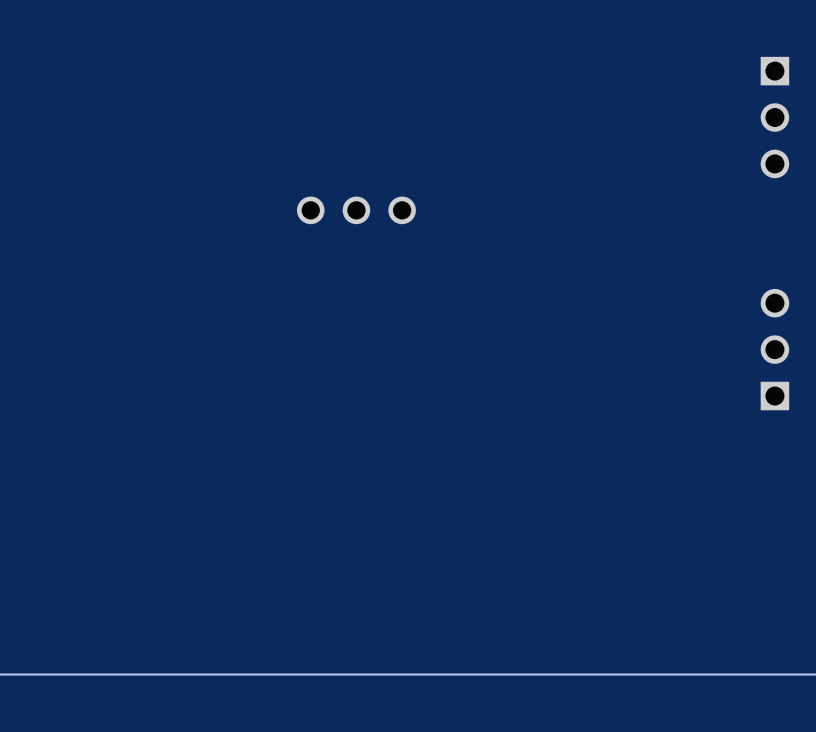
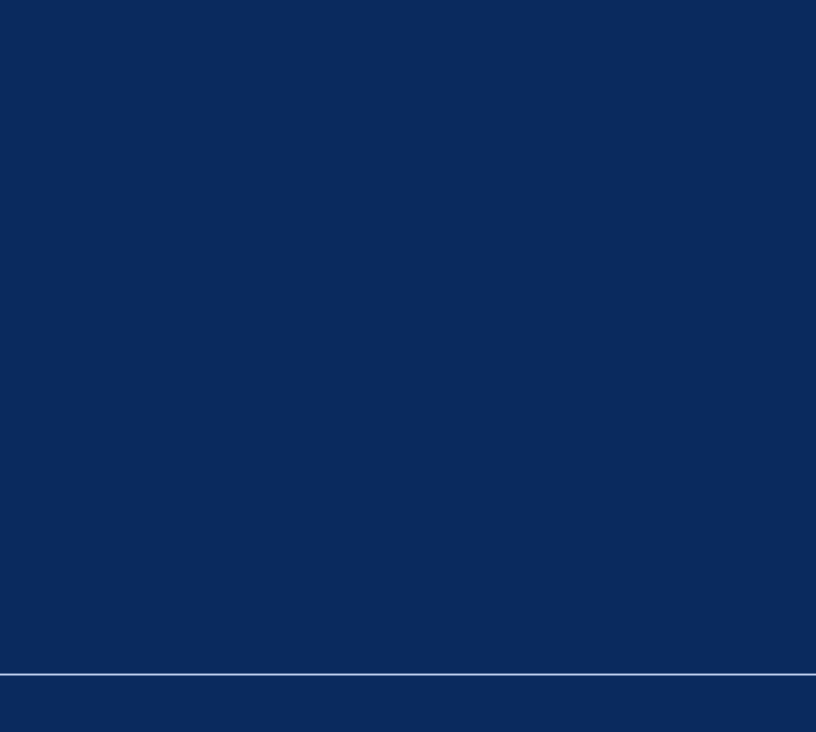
part: (774, 117) -> none
part: (356, 210) -> none
part: (774, 349) -> none

